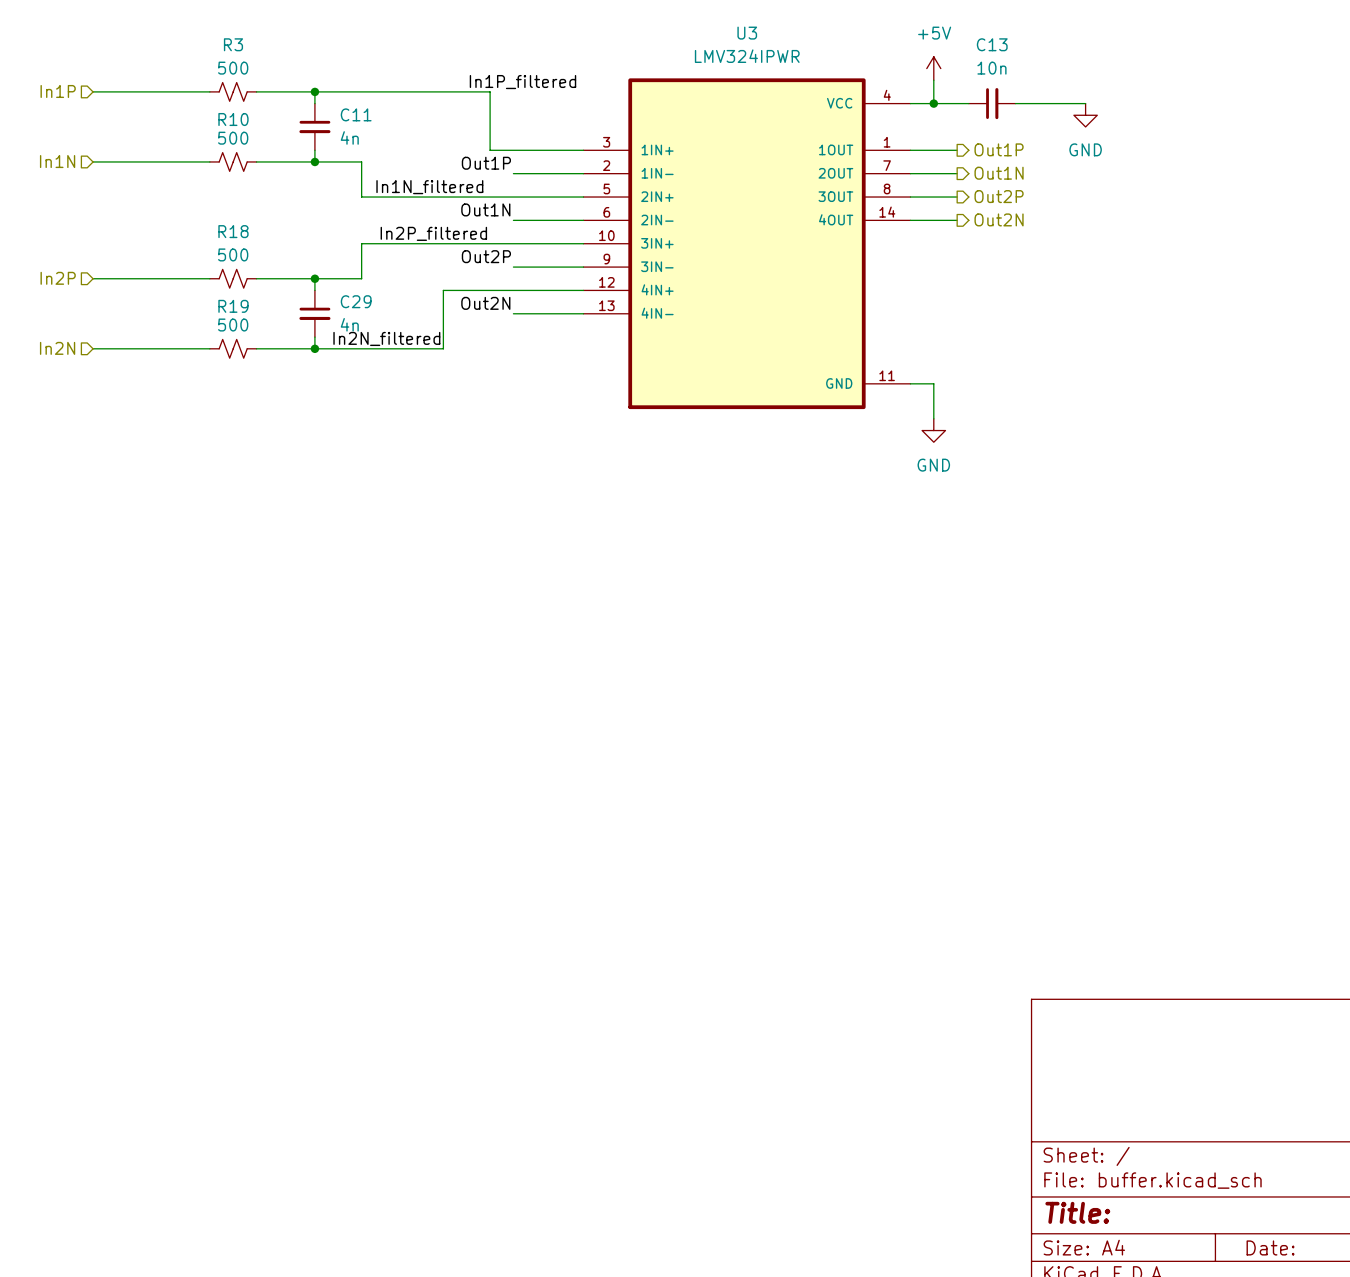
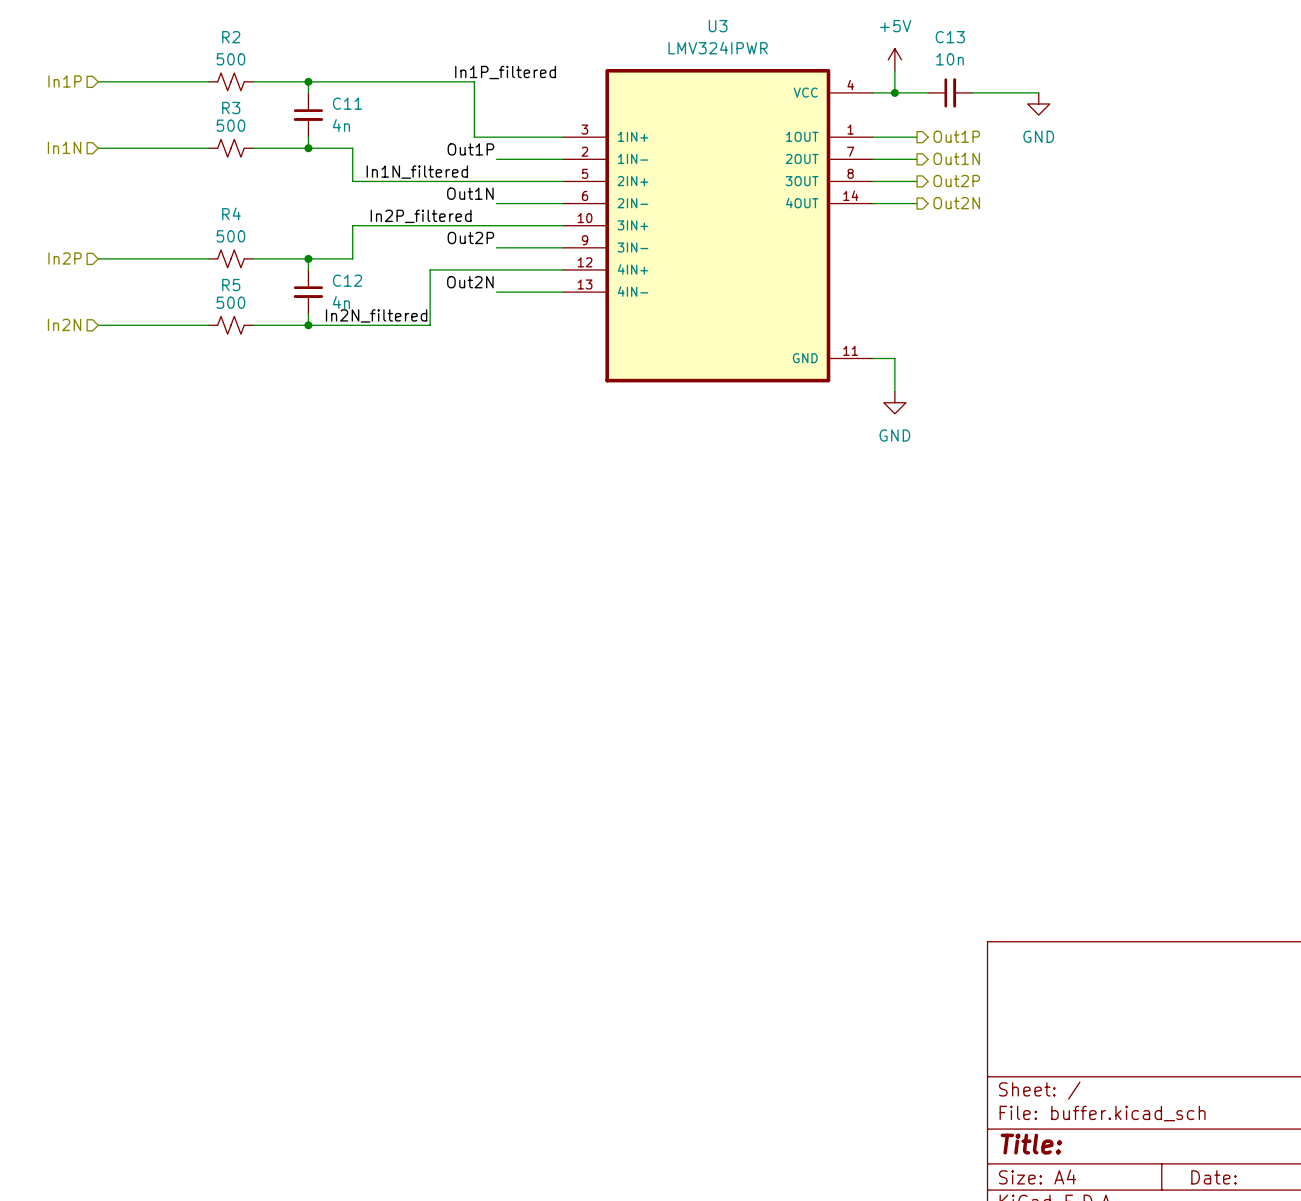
R3 name: R3 (233, 44) -> R2 (231, 37)
R10 name: R10 (233, 119) -> R3 (231, 108)
R18 name: R18 (233, 231) -> R4 (231, 213)
C29 name: C29 (356, 301) -> C12 (347, 280)
R19 name: R19 (233, 306) -> R5 (231, 285)

